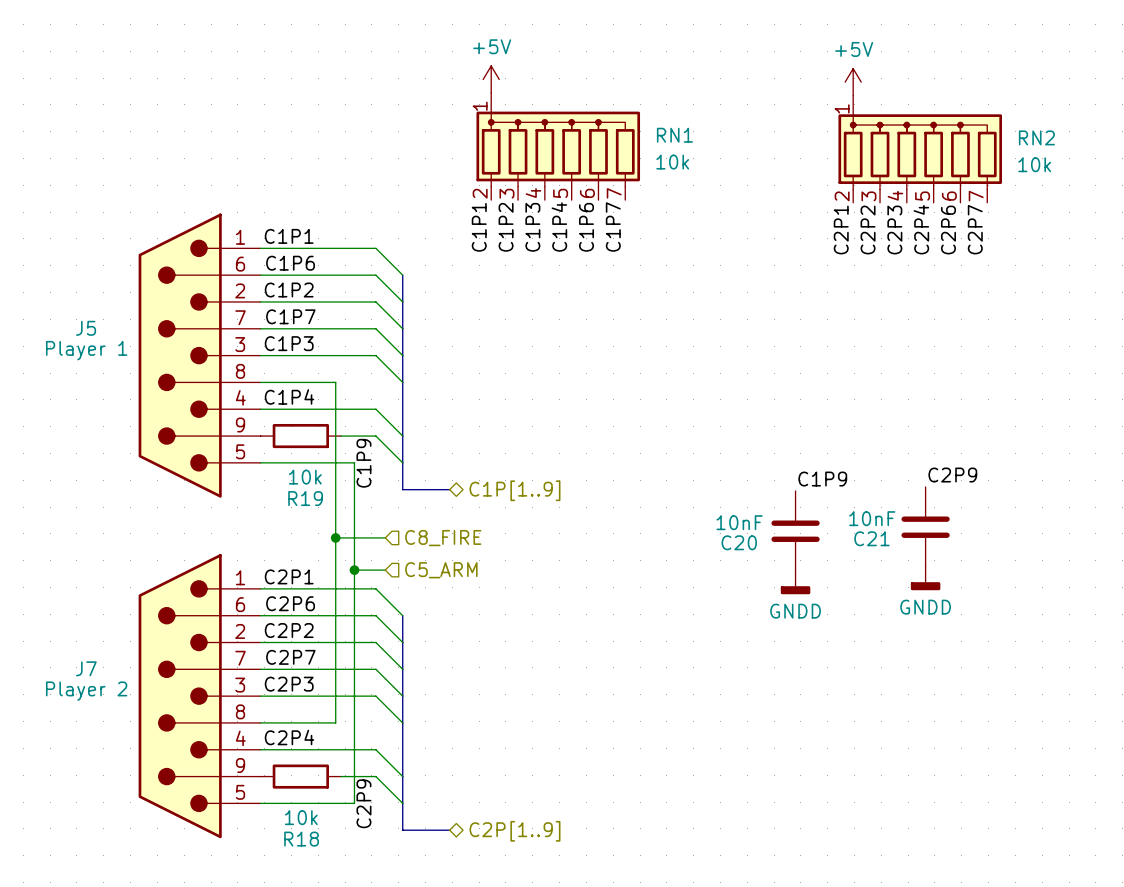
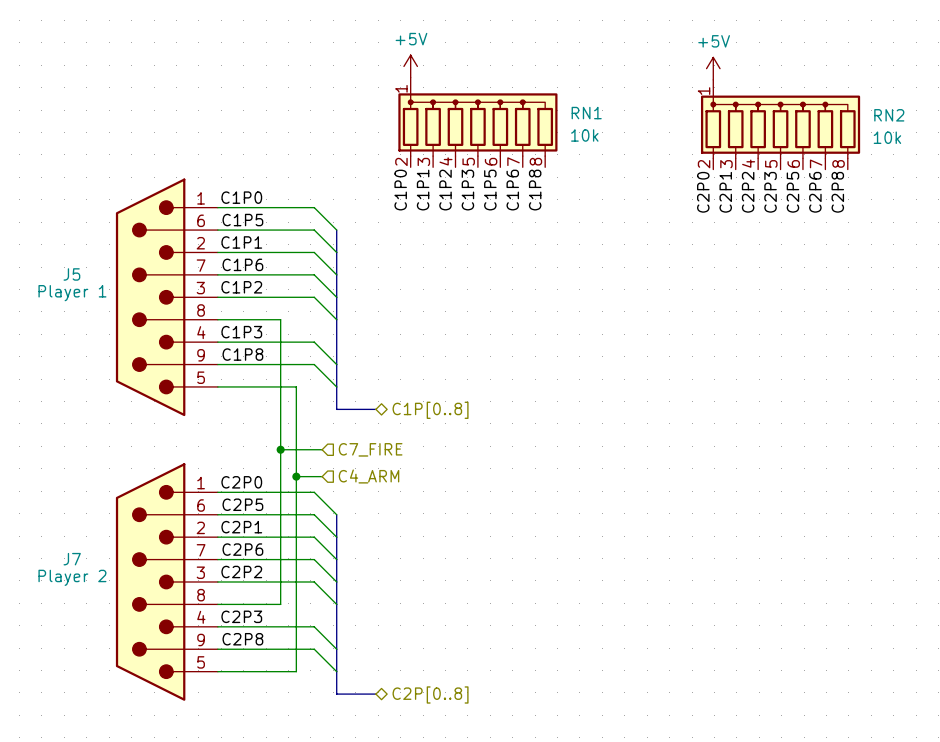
RN1 symbol: [476, 92, 641, 201] -> [398, 77, 558, 168]
RN2 symbol: [838, 95, 1003, 203] -> [700, 79, 861, 170]
label: C1P1 (479, 227) -> C1P0 (400, 190)
label: C1P2 (506, 227) -> C1P1 (423, 190)
label: C1P3 (532, 227) -> C1P2 (445, 190)
label: C1P4 (559, 227) -> C1P3 (467, 190)
label: C1P6 (586, 227) -> C1P5 (490, 190)
label: C1P7 (613, 227) -> C1P6 (512, 190)
label: none -> C1P8 (535, 190)
label: C2P4 (921, 229) -> C2P3 (770, 192)
label: C2P7 (975, 229) -> C2P6 (815, 192)
label: C2P1 (841, 230) -> C2P0 (703, 192)
label: C2P2 (868, 230) -> C2P1 (725, 192)
label: C2P3 (894, 230) -> C2P2 (748, 192)
label: C2P6 (948, 230) -> C2P5 (792, 192)
label: none -> C2P8 (837, 192)
label: C1P1 (289, 236) -> C1P0 (241, 197)
label: C1P6 (290, 263) -> C1P5 (242, 220)
label: C1P2 (289, 290) -> C1P1 (241, 242)
label: C1P7 (290, 316) -> C1P6 (242, 264)
label: C1P3 (289, 343) -> C1P2 (241, 287)
label: C1P4 (289, 396) -> C1P3 (241, 332)
label: none -> C1P8 (242, 354)
wire: none -> (217, 364) (285, 364)
R19: 10k (300, 436) -> none
label: C1P9 (363, 463) -> none
label: C2P9 (952, 475) -> none
label: C1P9 (822, 479) -> none
hierarchical label: C1P[1..9] (514, 490) -> C1P[0..8] (430, 410)
C21: 10nF (925, 527) -> none
C20: 10nF (795, 531) -> none
hierarchical label: C8_FIRE (443, 538) -> C7_FIRE (370, 449)
hierarchical label: C5_ARM (441, 570) -> C4_ARM (369, 476)
label: C2P1 (289, 576) -> C2P0 (241, 482)
power symbol: GNDD (925, 578) -> none
power symbol: GNDD (795, 582) -> none
label: C2P6 (290, 603) -> C2P5 (242, 504)
label: C2P2 (289, 630) -> C2P1 (241, 527)
label: C2P7 (290, 657) -> C2P6 (242, 549)
label: C2P3 (289, 684) -> C2P2 (241, 571)
label: C2P4 (289, 737) -> C2P3 (241, 616)
label: none -> C2P8 (242, 639)
wire: none -> (217, 649) (285, 649)
R18: 10k (300, 776) -> none
label: C2P9 (363, 803) -> none
hierarchical label: C2P[1..9] (514, 831) -> C2P[0..8] (430, 694)

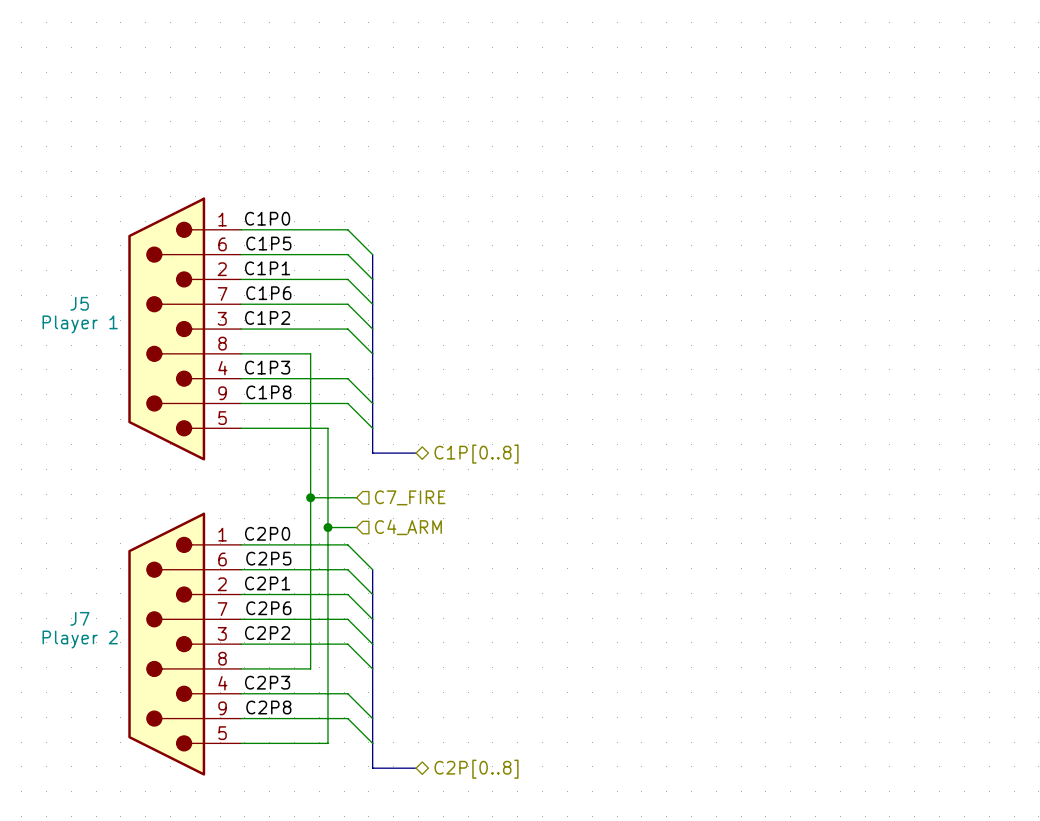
power symbol: +5V (410, 66) -> none
power symbol: +5V (713, 68) -> none
RN1: 10k (477, 122) -> none
RN2: 10k (780, 124) -> none
label: C1P0 (400, 190) -> none
label: C1P1 (423, 190) -> none
label: C1P2 (445, 190) -> none
label: C1P3 (467, 190) -> none
label: C1P5 (490, 190) -> none
label: C1P6 (512, 190) -> none
label: C1P8 (535, 190) -> none
label: C2P0 (703, 192) -> none
label: C2P1 (725, 192) -> none
label: C2P2 (748, 192) -> none
label: C2P3 (770, 192) -> none
label: C2P5 (792, 192) -> none
label: C2P6 (815, 192) -> none
label: C2P8 (837, 192) -> none

